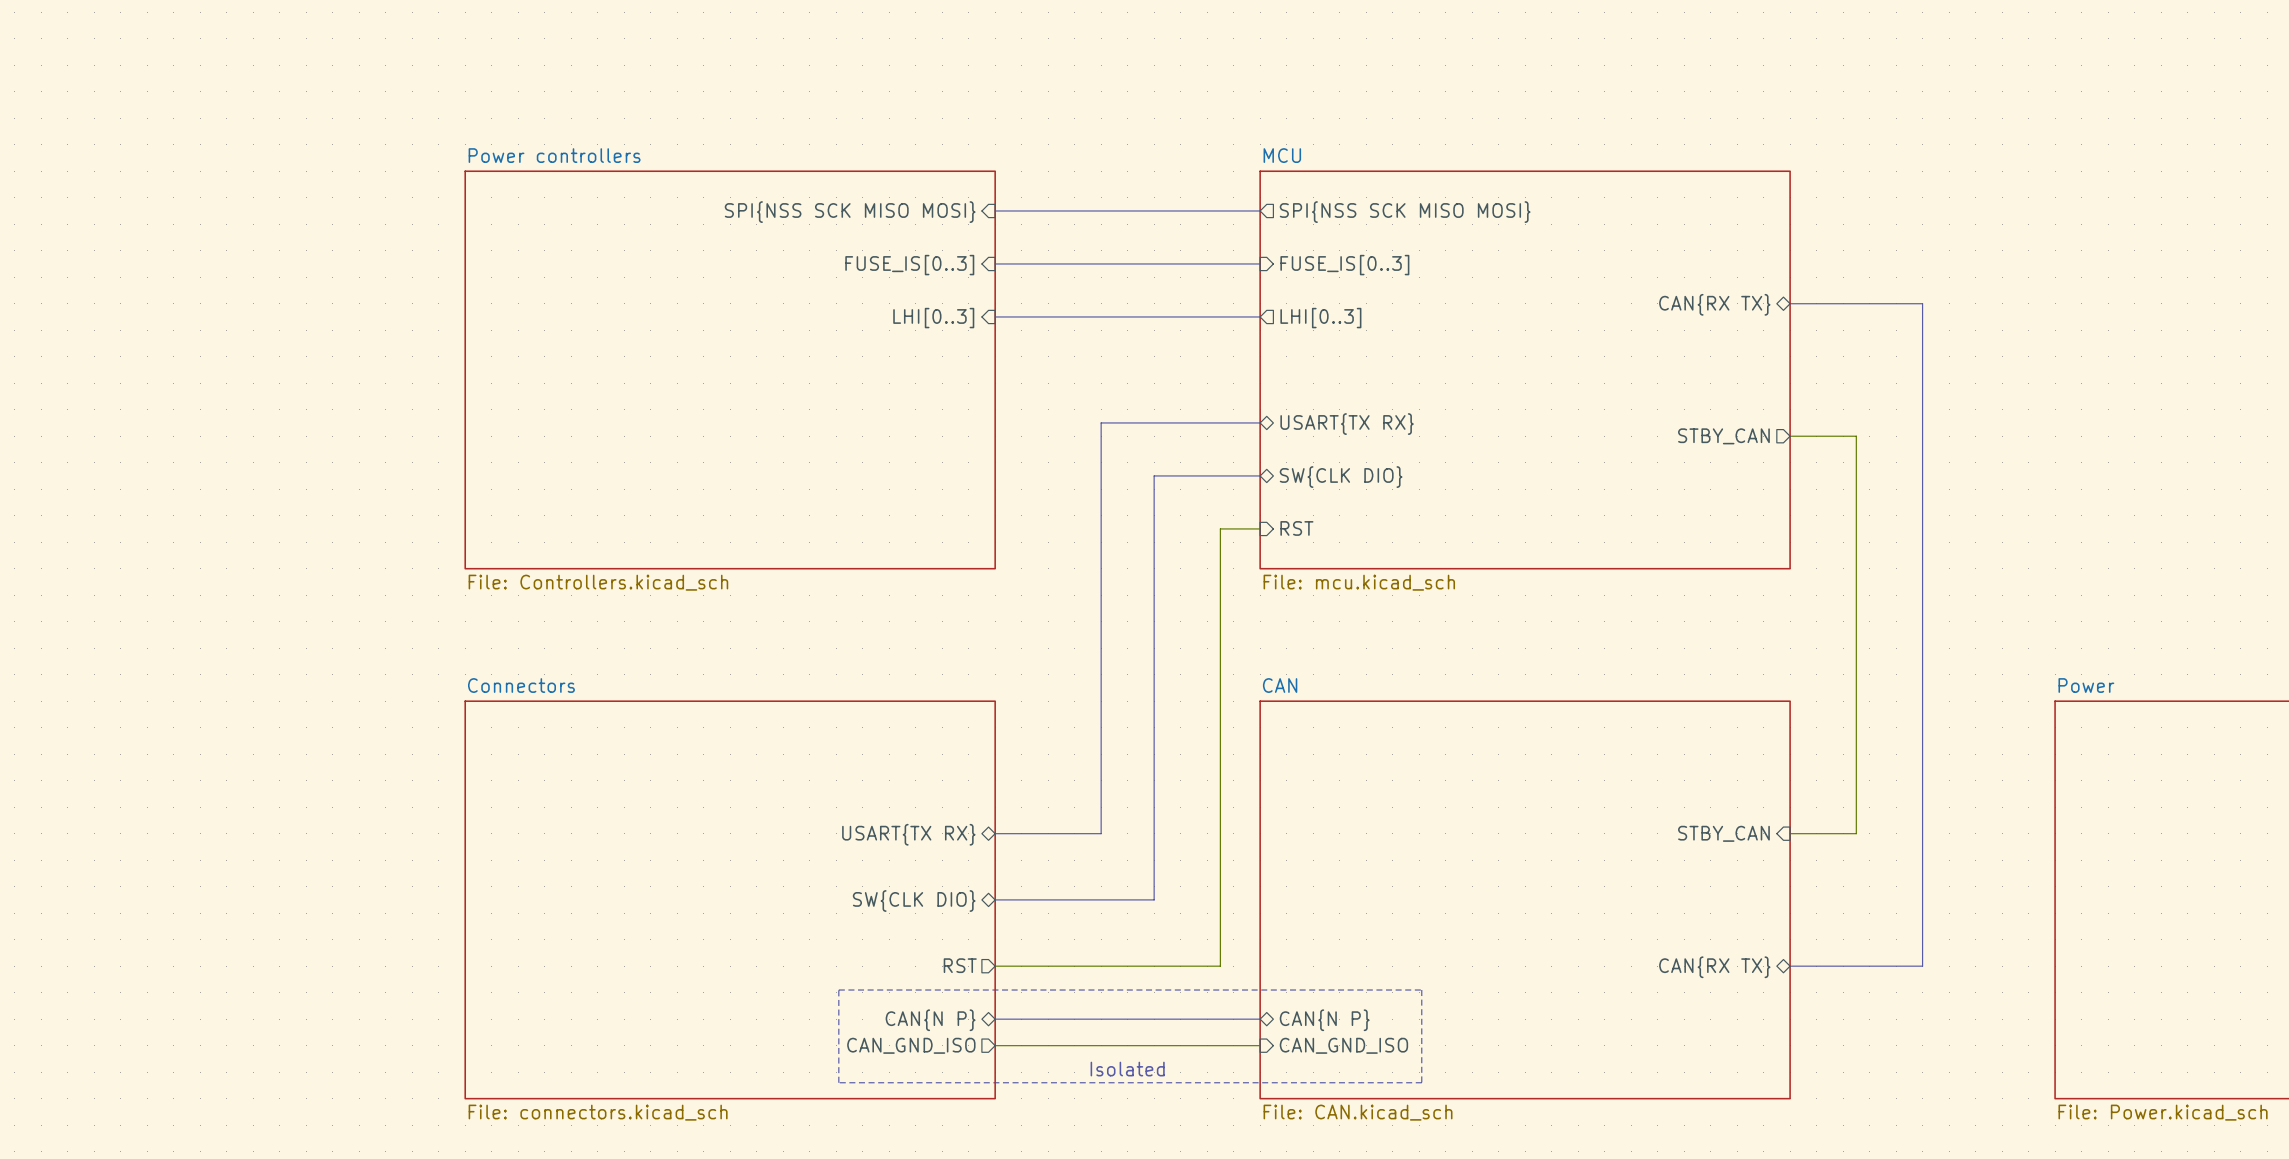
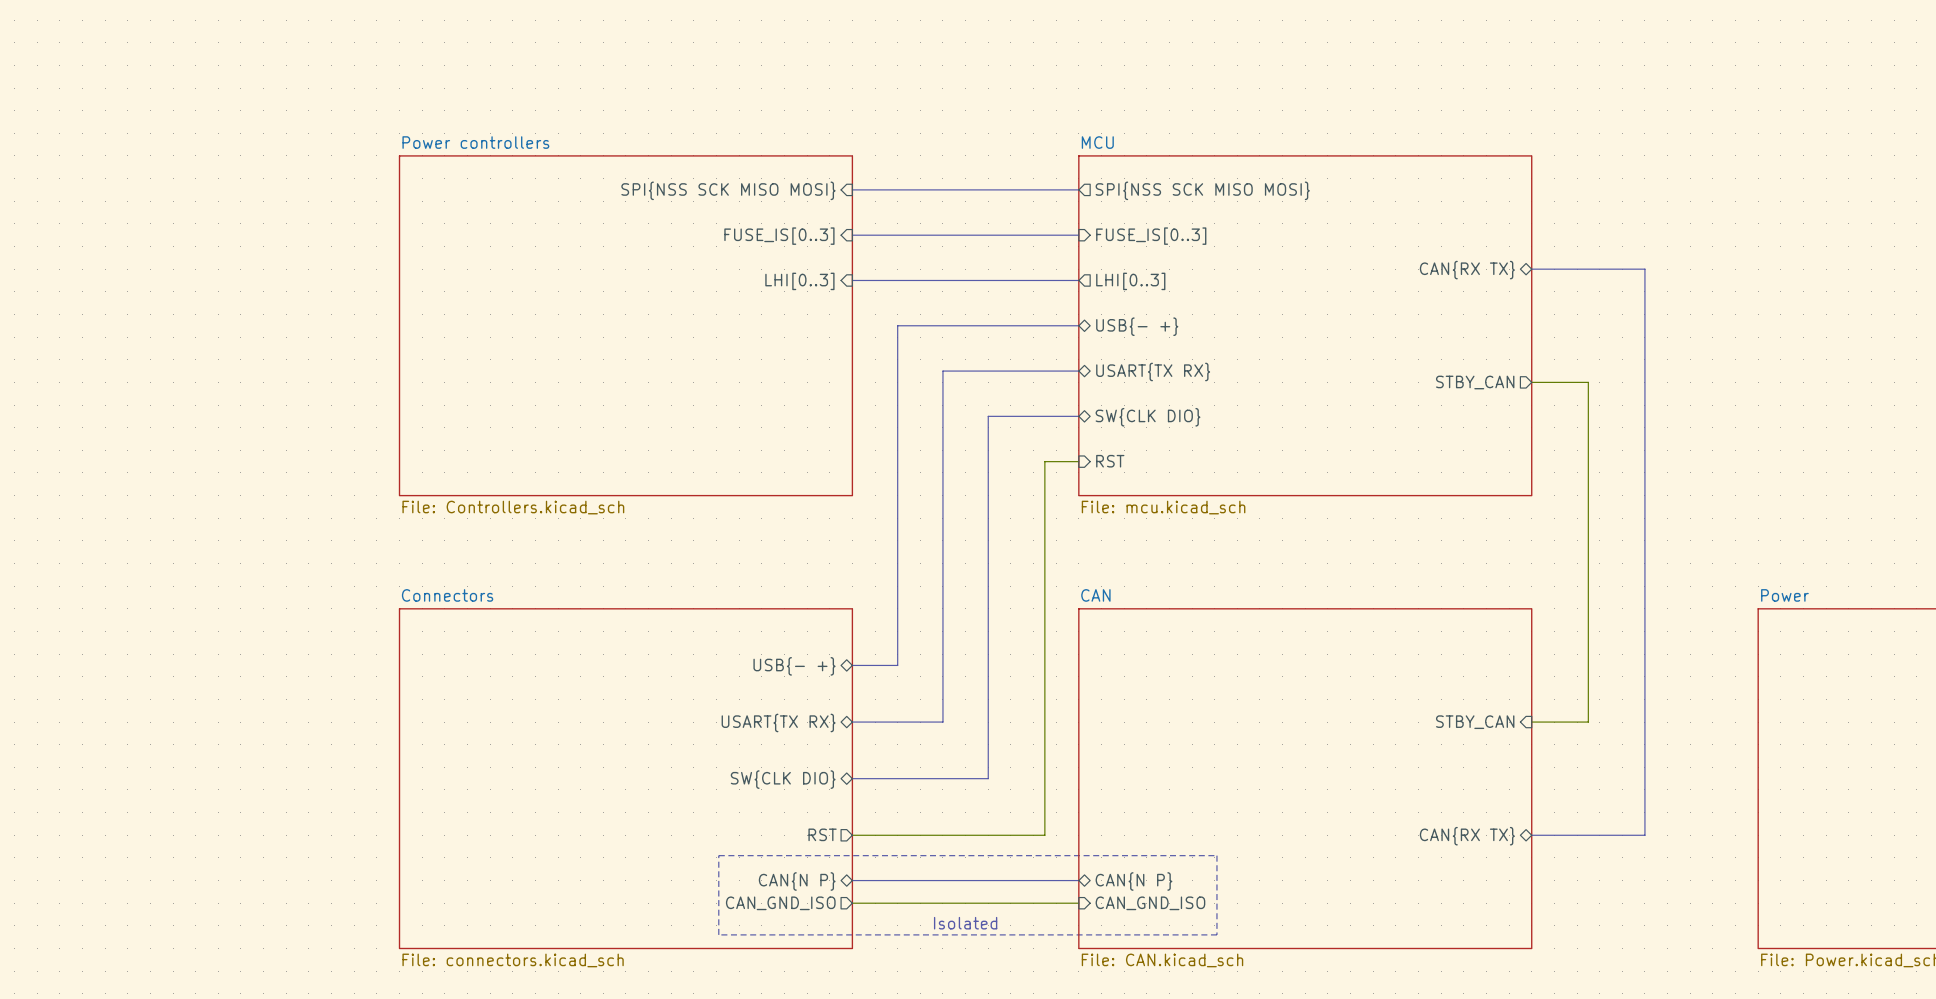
bus: none -> (1078, 325) (897, 325) (897, 665) (852, 665)
sheet pin: none -> USB{- +} (1137, 326)
sheet pin: none -> USB{- +} (794, 666)

